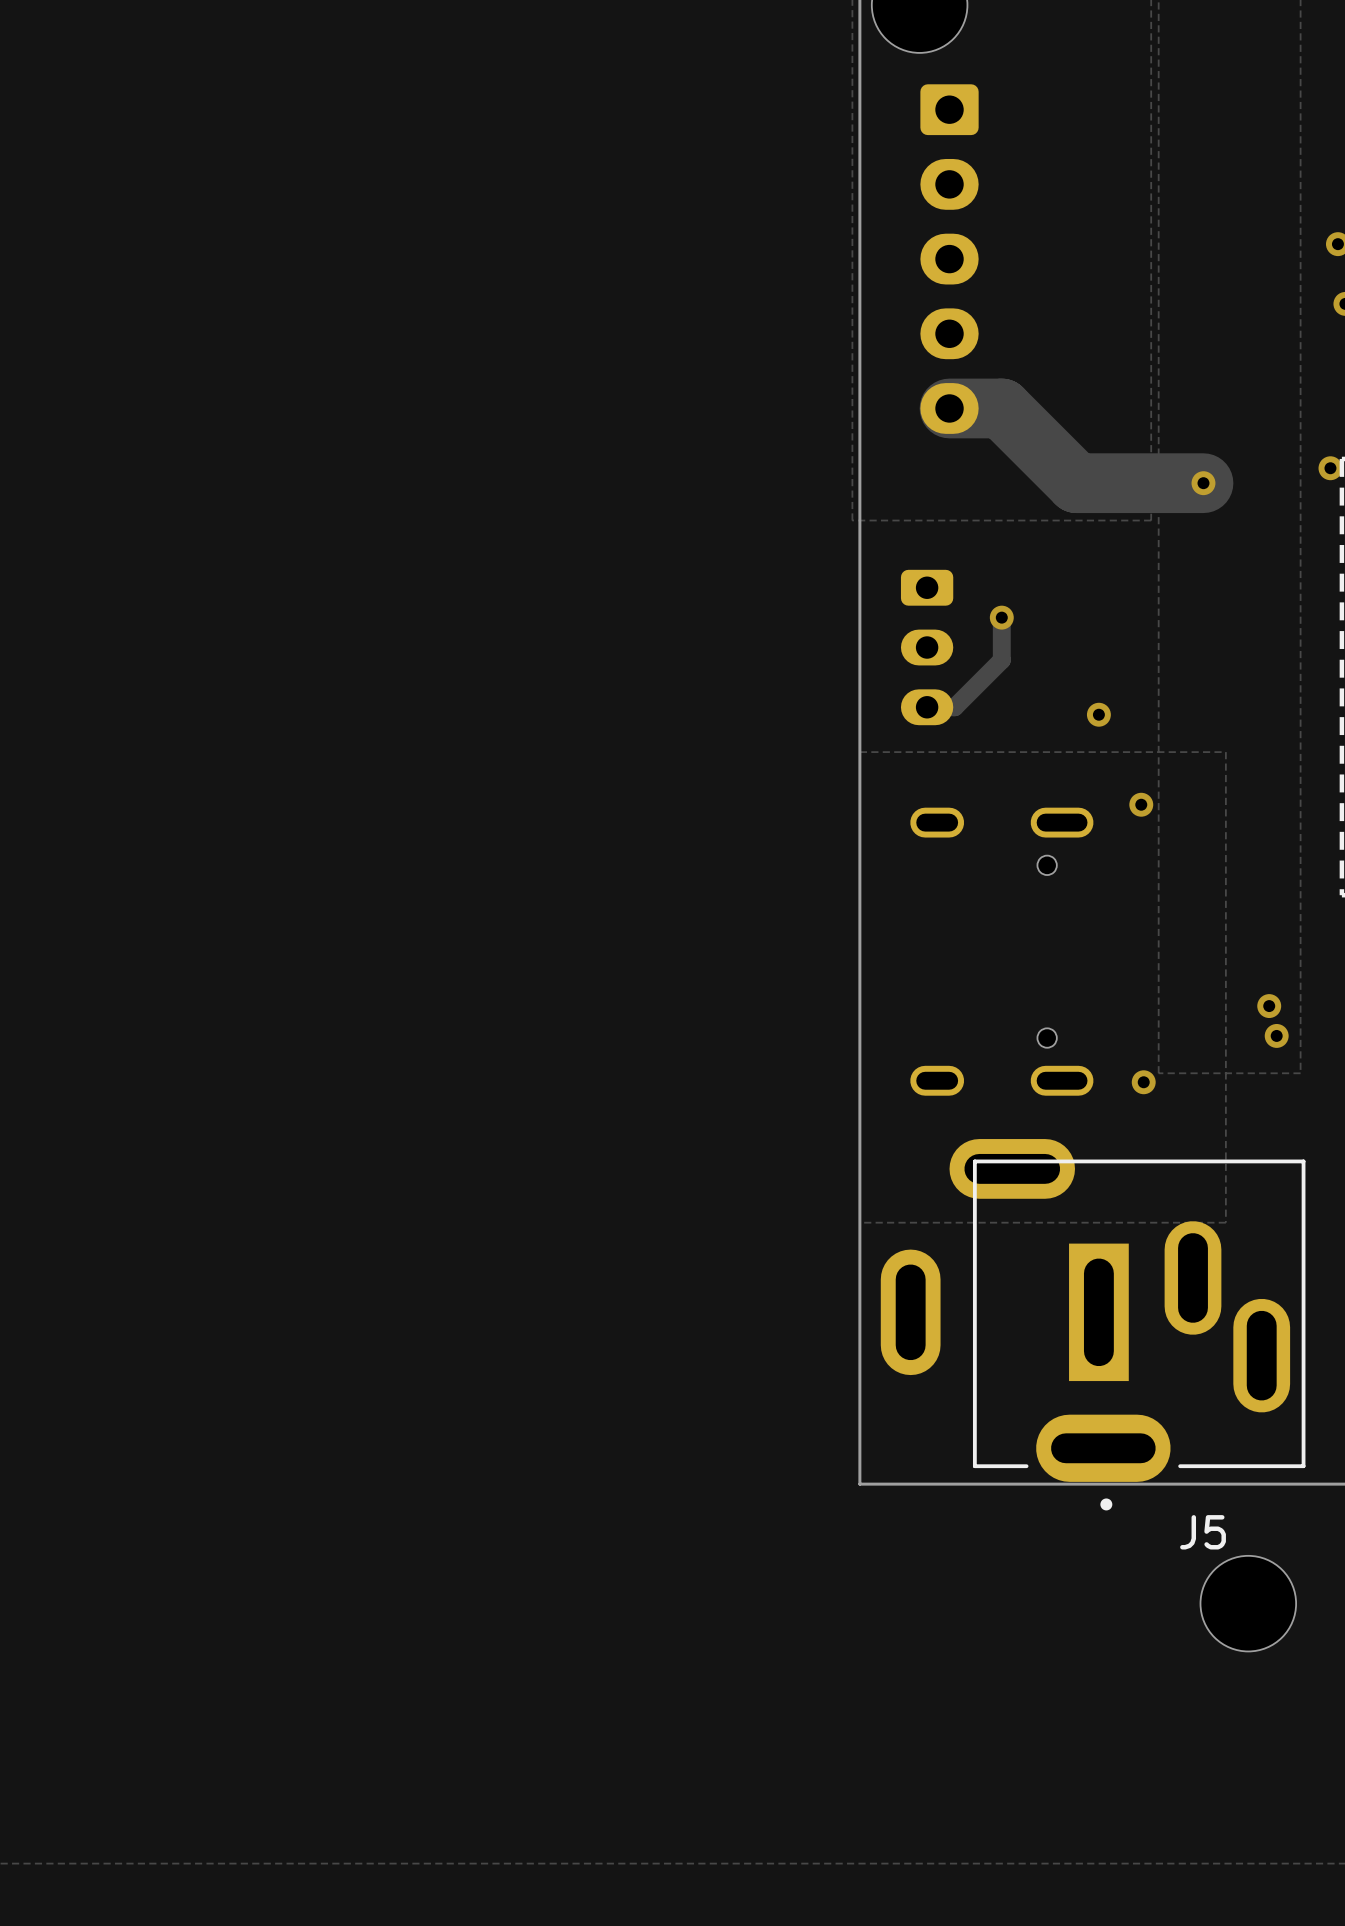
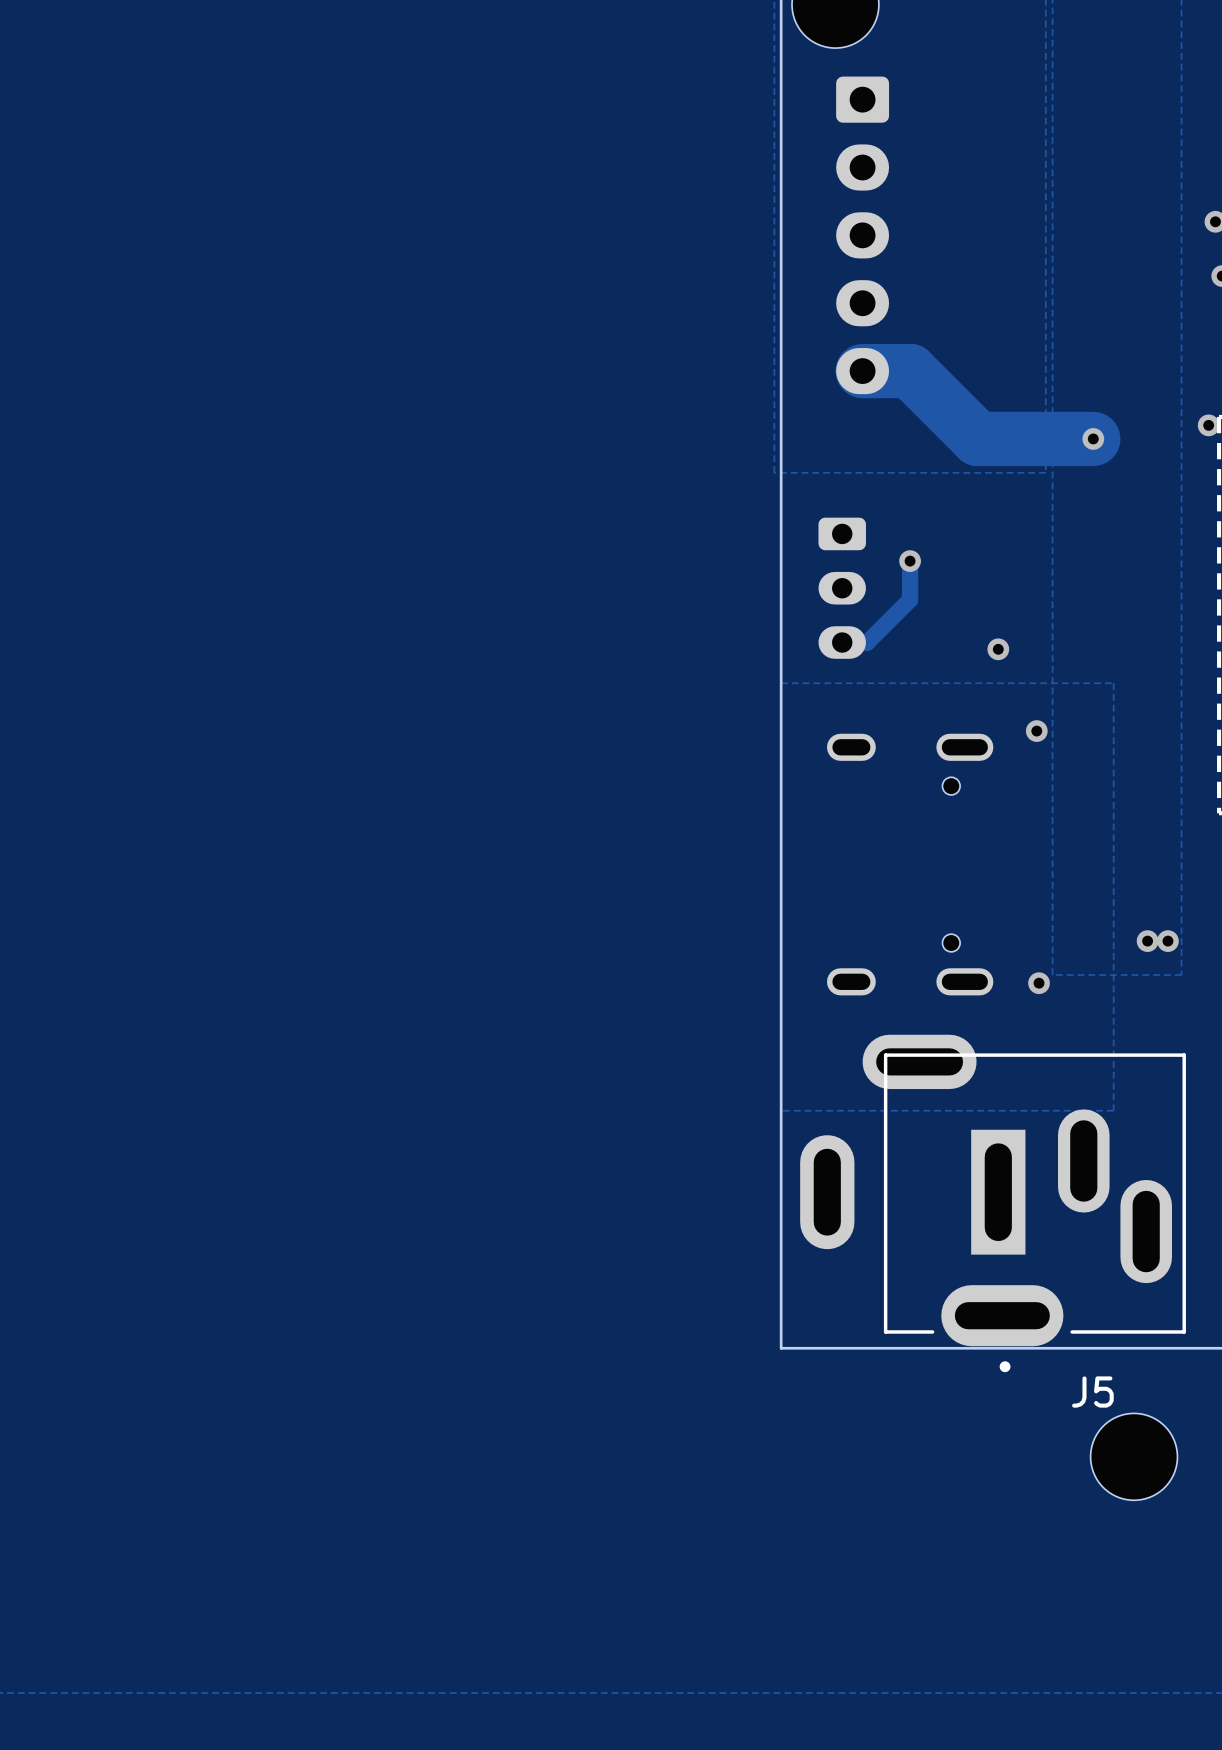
via: (1269, 1006) -> none
via: none -> (1147, 941)
via: (1276, 1035) -> none
via: none -> (1167, 941)

